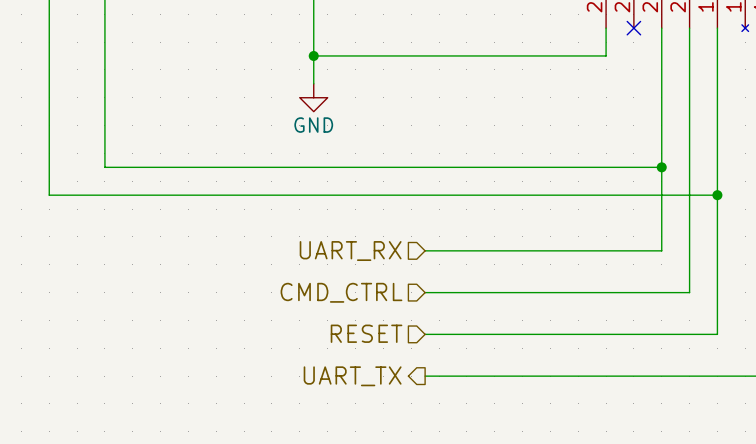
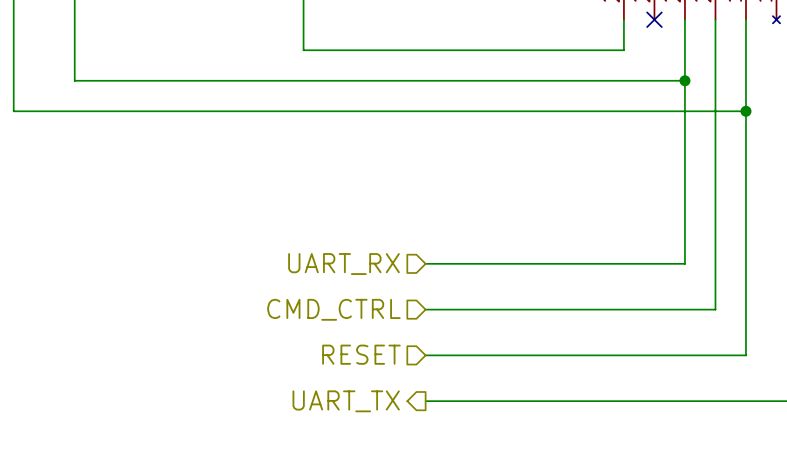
wire: (313, 55) (313, 83) -> none
junction: (313, 55) -> none
wire: (104, 83) (104, 167) (661, 167) -> (74, 80) (684, 80)
junction: none -> (684, 80)
power symbol: GND (313, 97) -> none
wire: (49, 111) (49, 195) (717, 195) -> (13, 111) (745, 111)
junction: none -> (745, 111)
junction: (661, 167) -> none
junction: (717, 195) -> none

